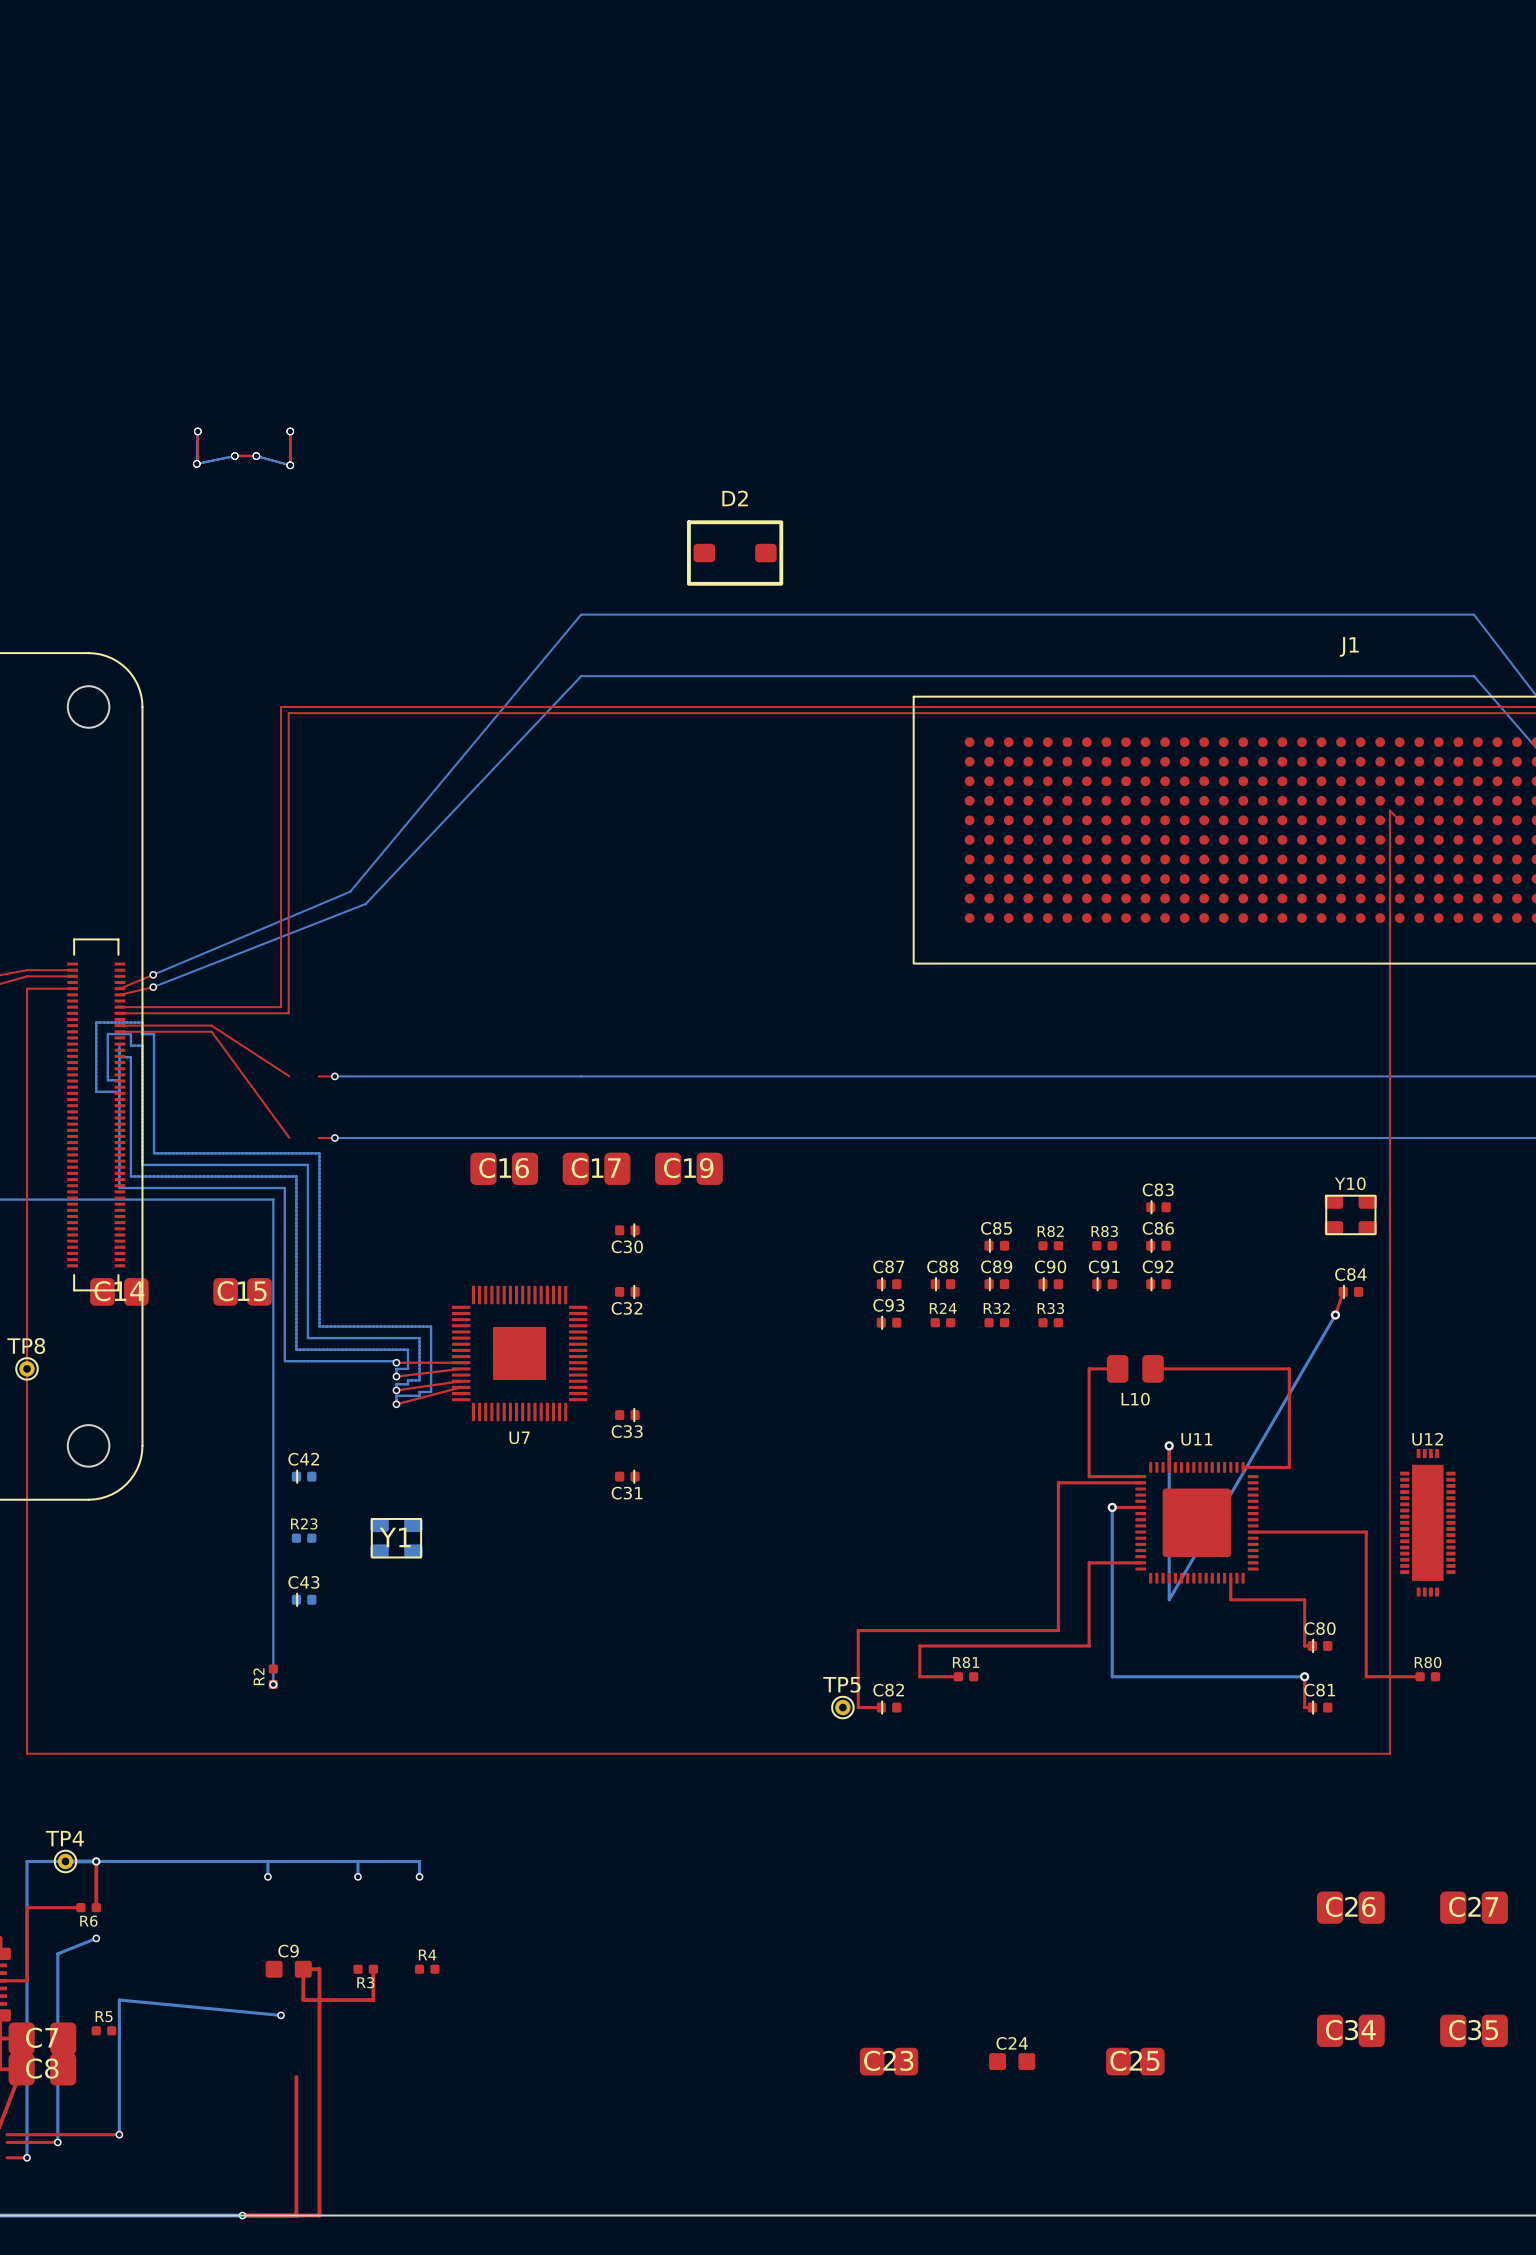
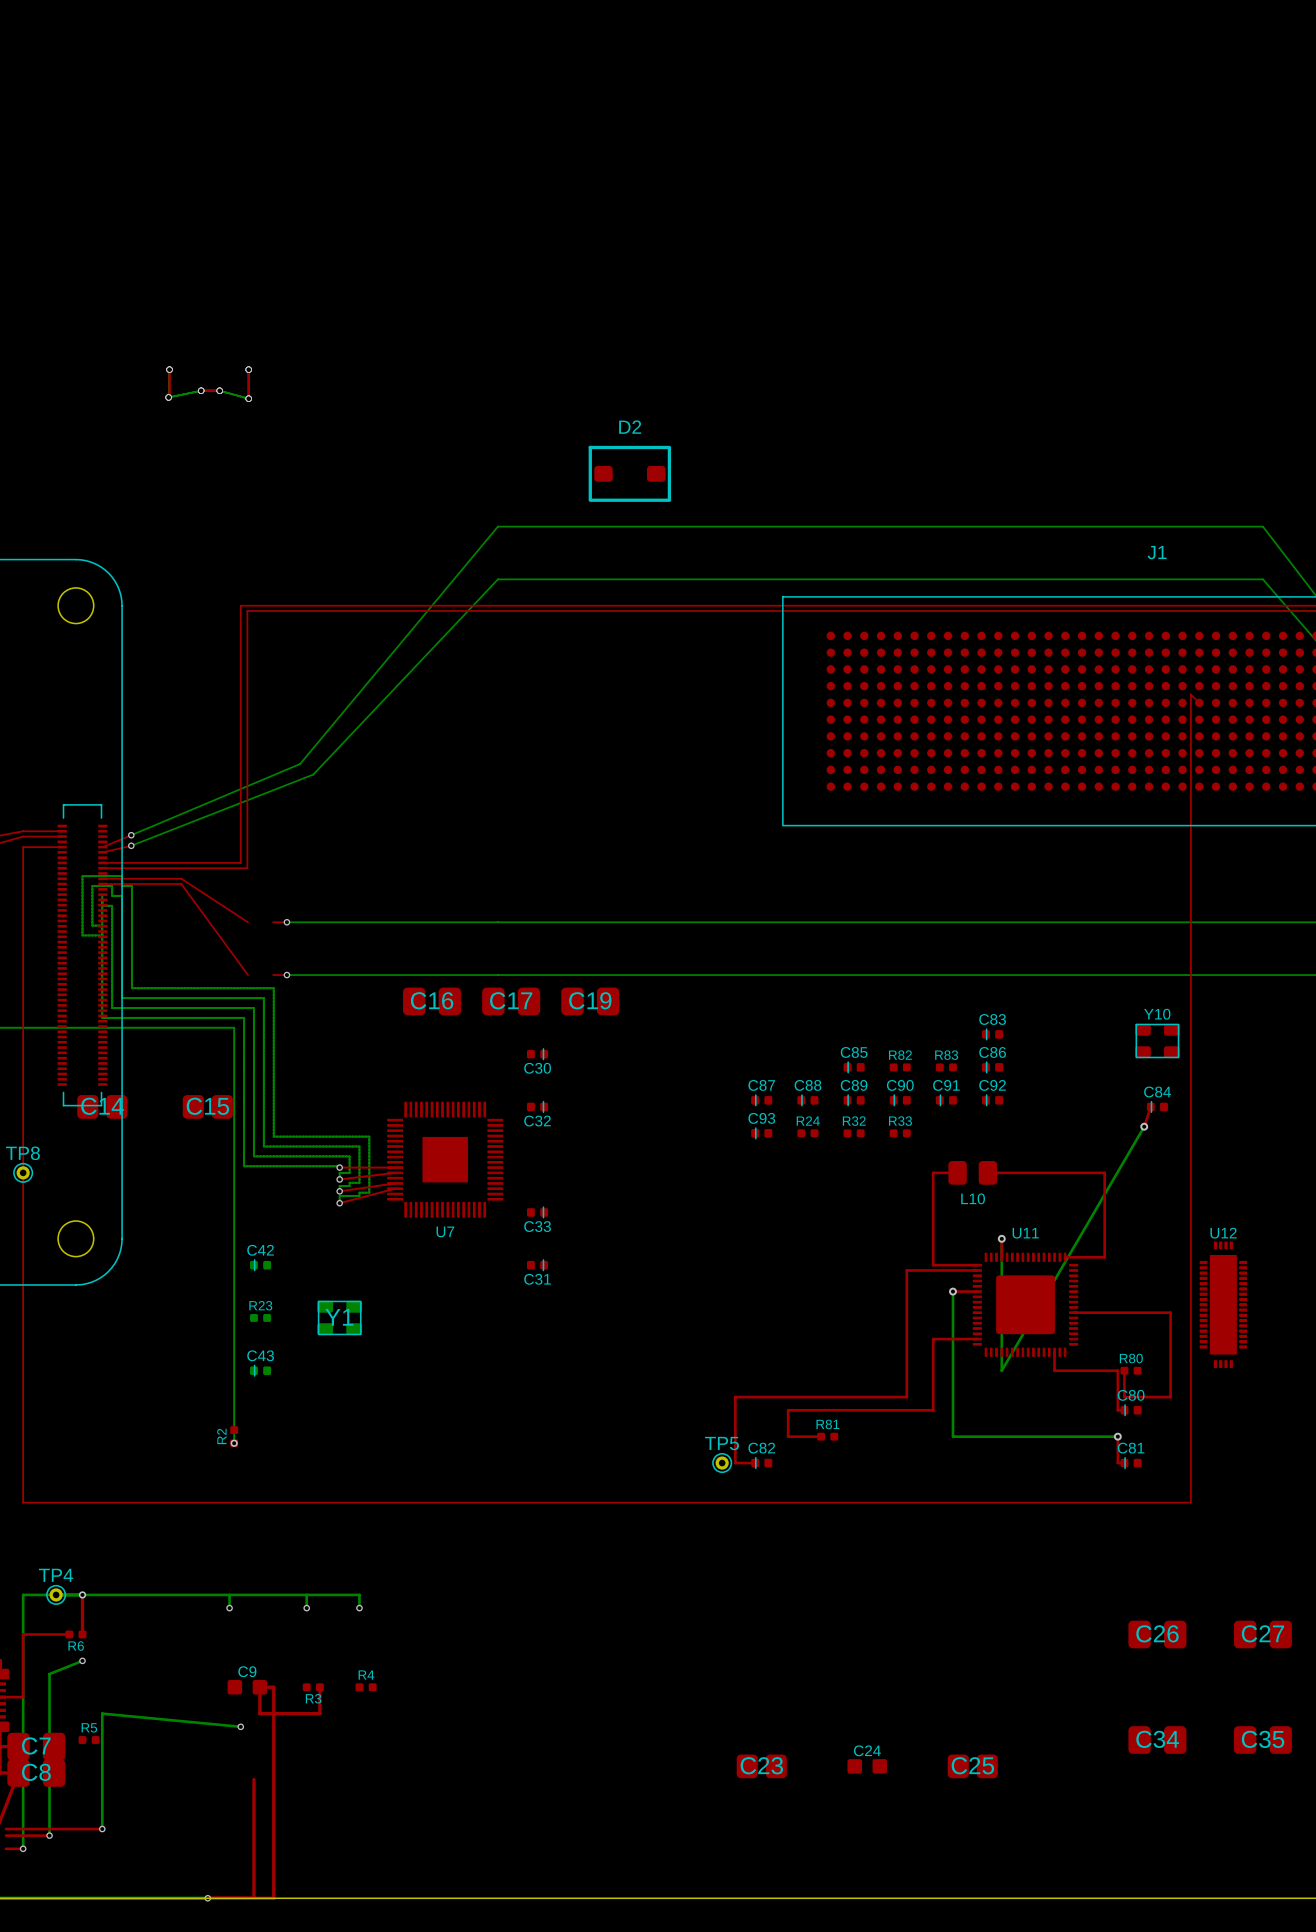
top track: (1366, 1630) (1366, 1676) (1420, 1676) -> (1170, 1397) (1124, 1397) (1124, 1370)
R80 position: (1427, 1676) -> (1131, 1370)

